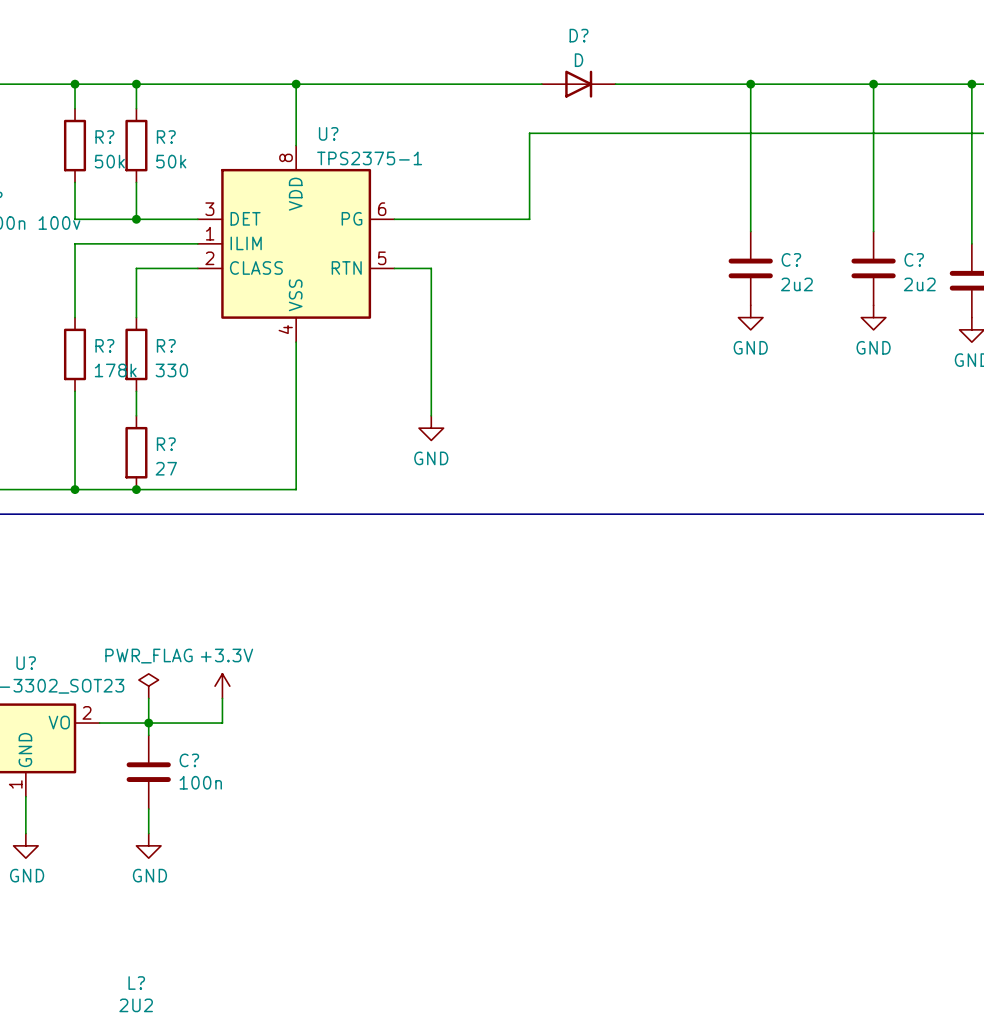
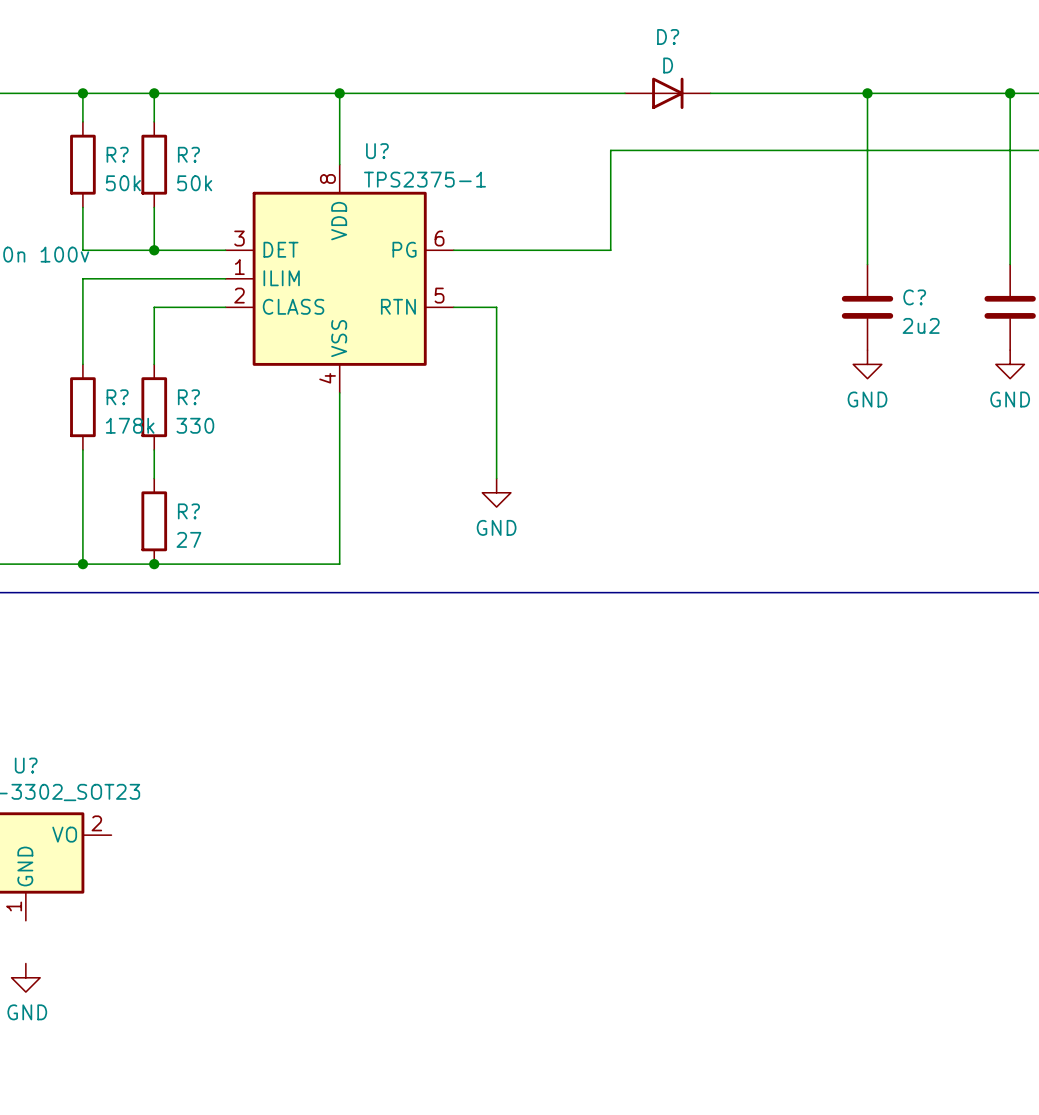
power symbol: PWR_FLAG (148, 686) -> none
power symbol: +3.3V (222, 686) -> none
wire: (148, 698) (148, 735) -> none
wire: (222, 698) (222, 723) (99, 723) -> none
junction: (148, 723) -> none
C?: 100n (148, 772) -> none
wire: (25, 796) (25, 833) -> none
wire: (148, 809) (148, 833) -> none
power symbol: GND (148, 845) -> none

